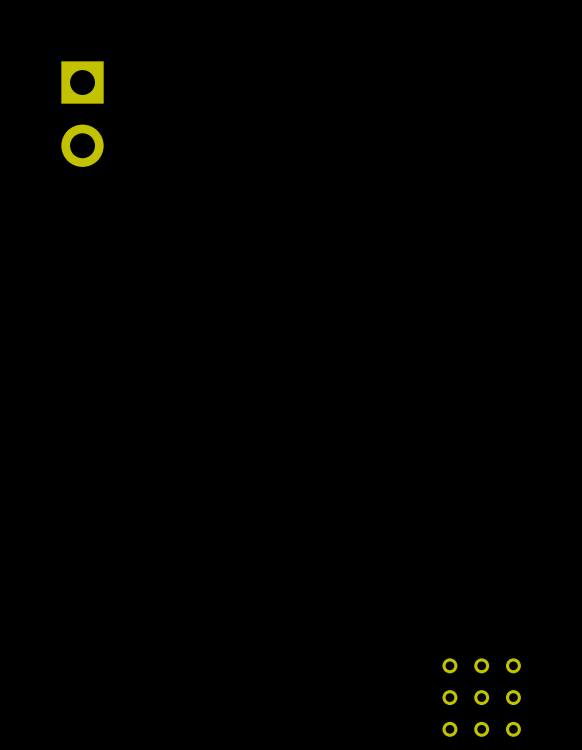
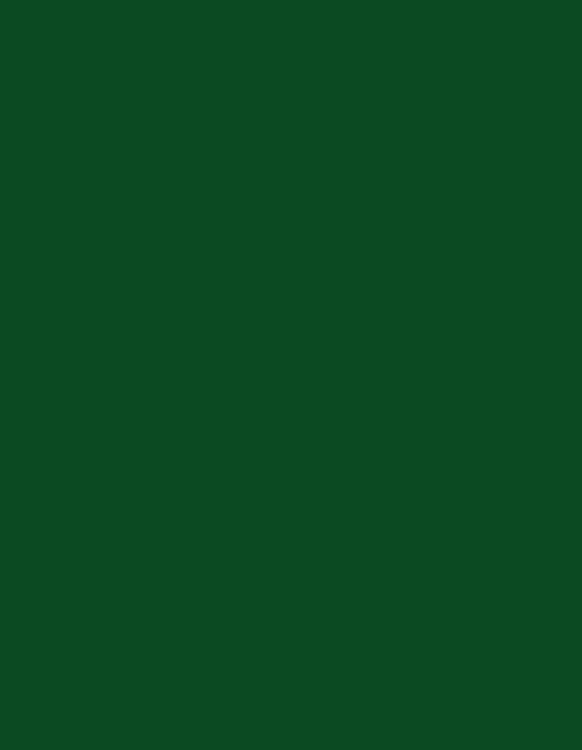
part: (82, 114) -> none
part: (481, 697) -> none

